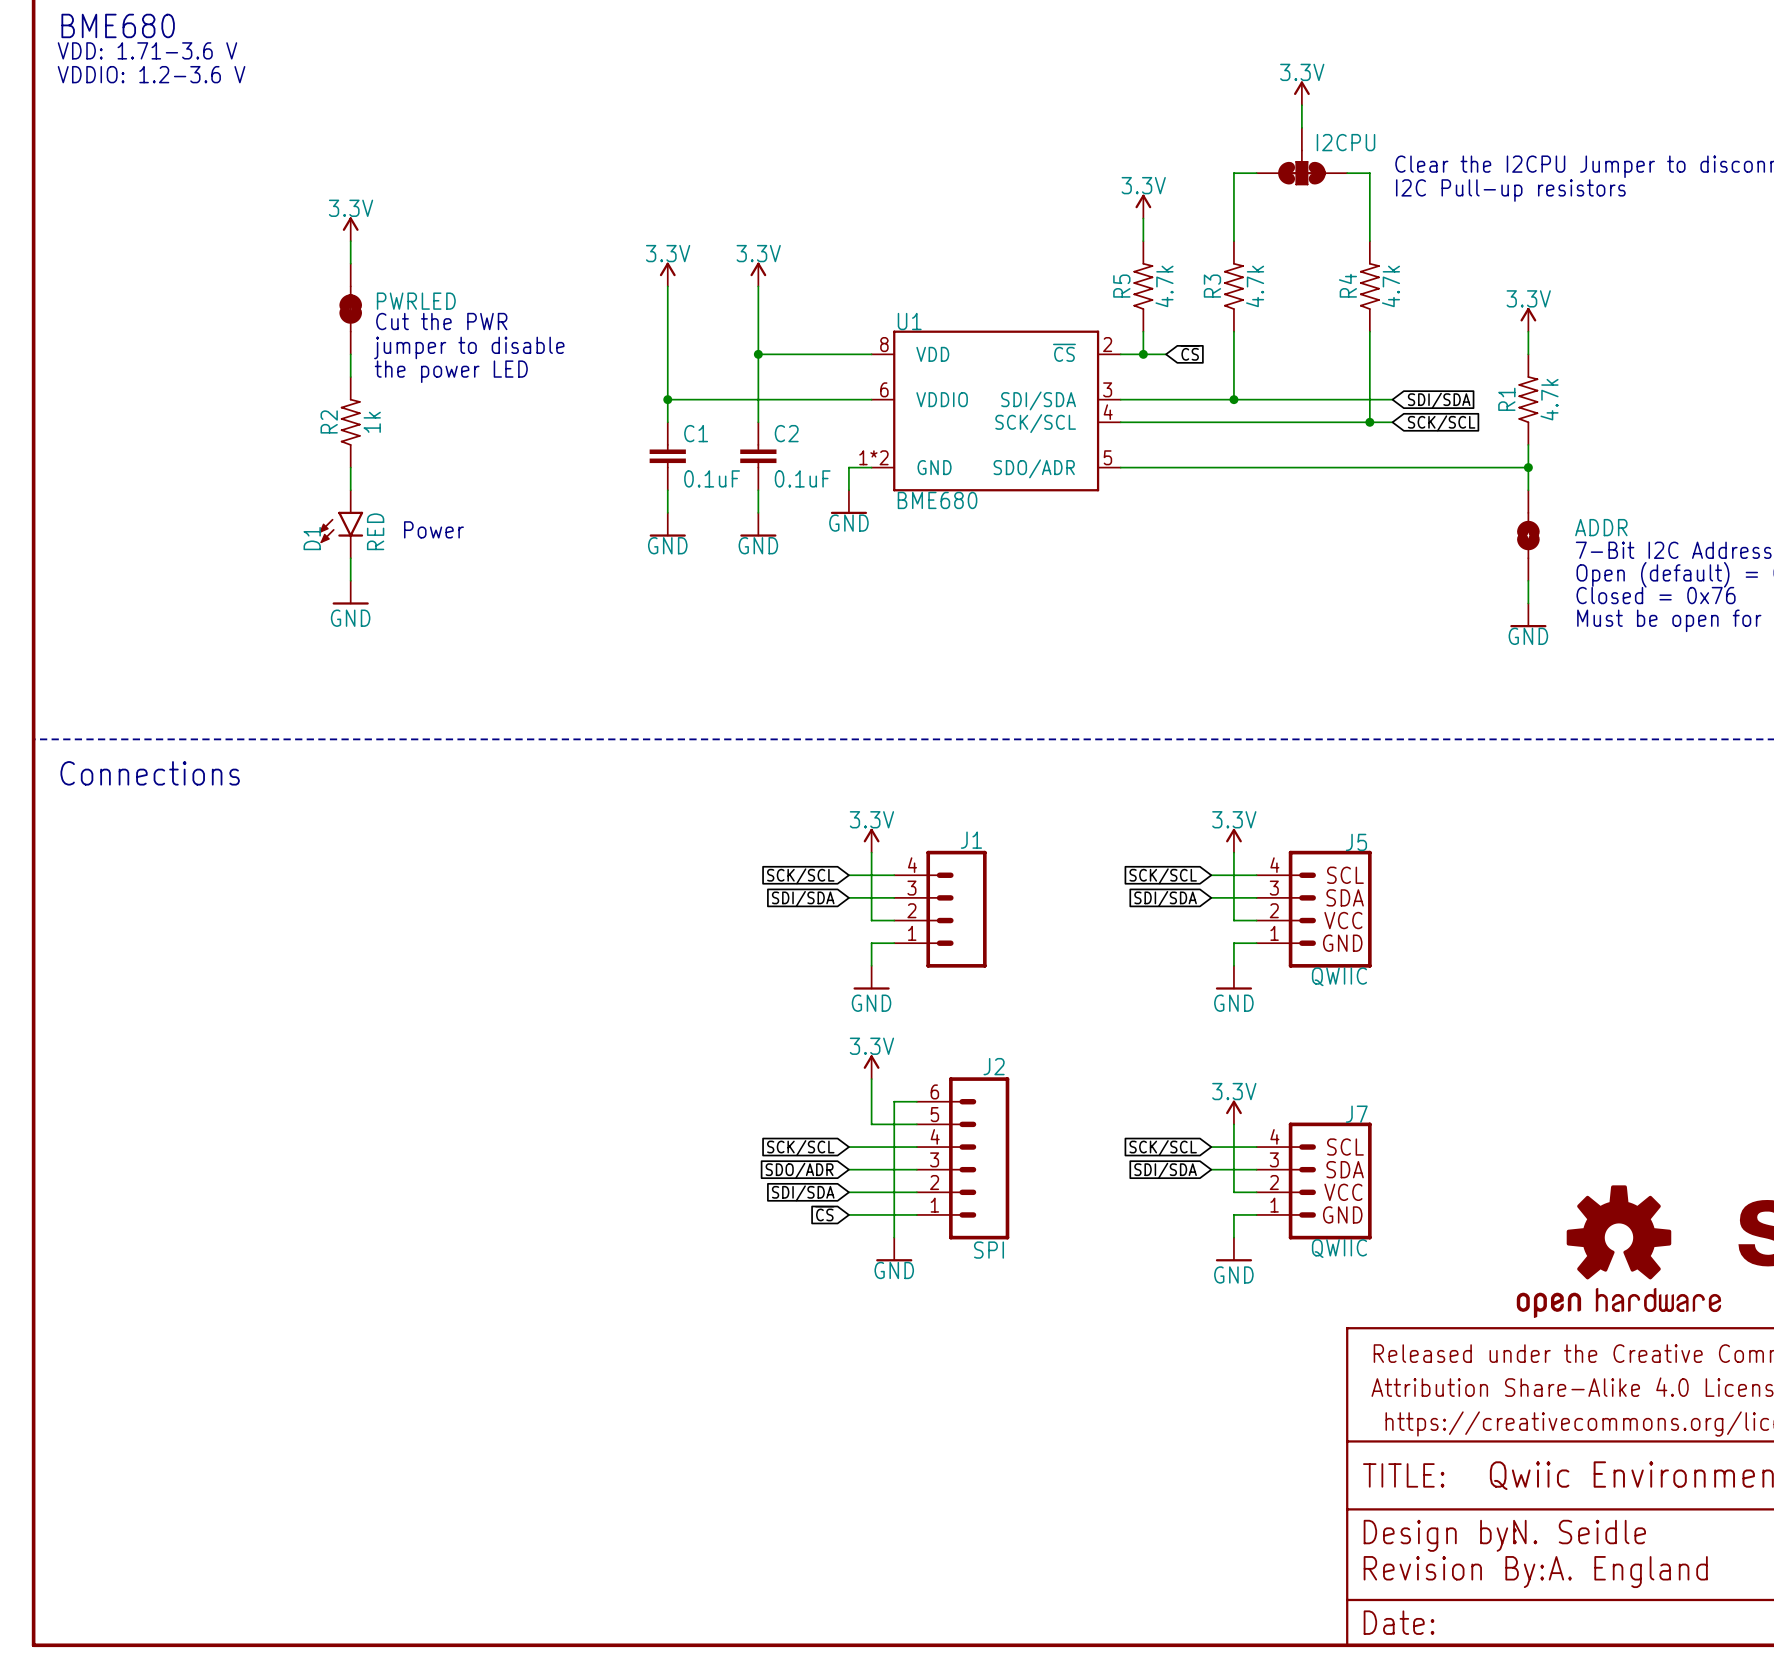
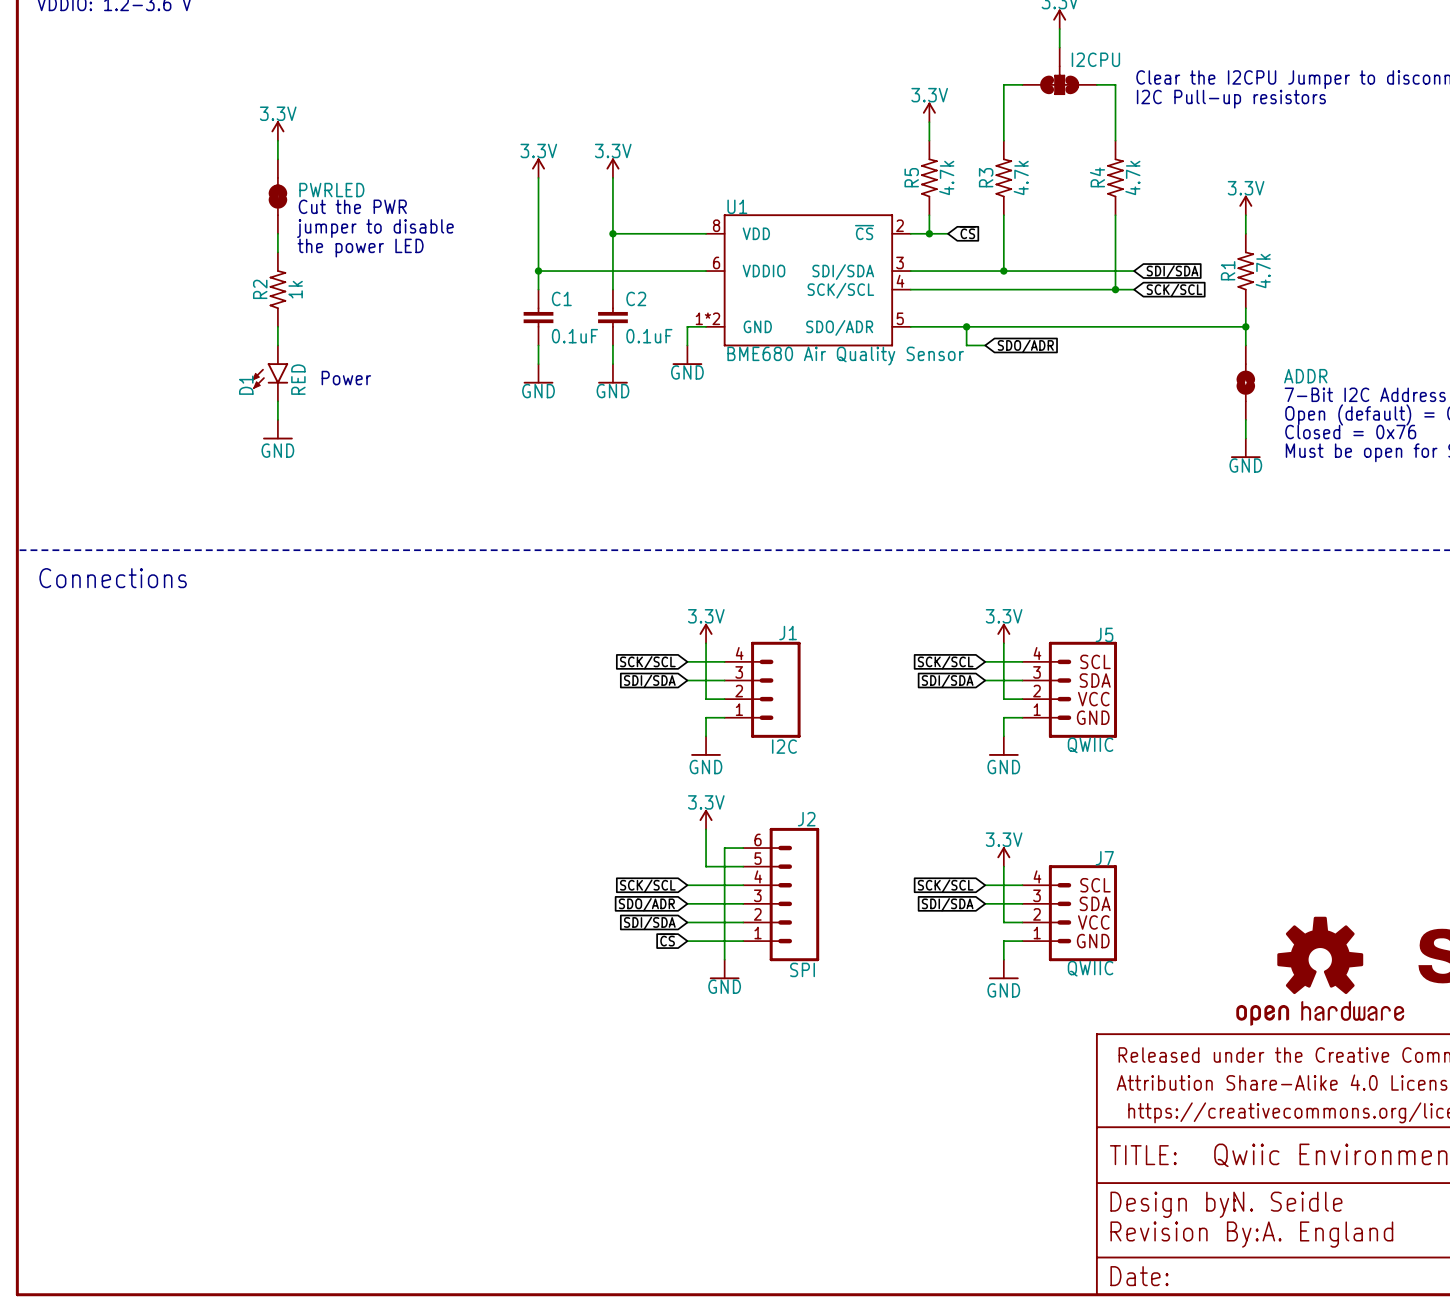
wire: none -> (966, 326) (966, 345) (985, 345)
junction: none -> (966, 326)
global label: none -> SDO/ADR (1025, 346)
U1 value: BME680 (937, 500) -> BME680 Air Quality Sensor (845, 356)
J1 value: none -> I2C (784, 746)

